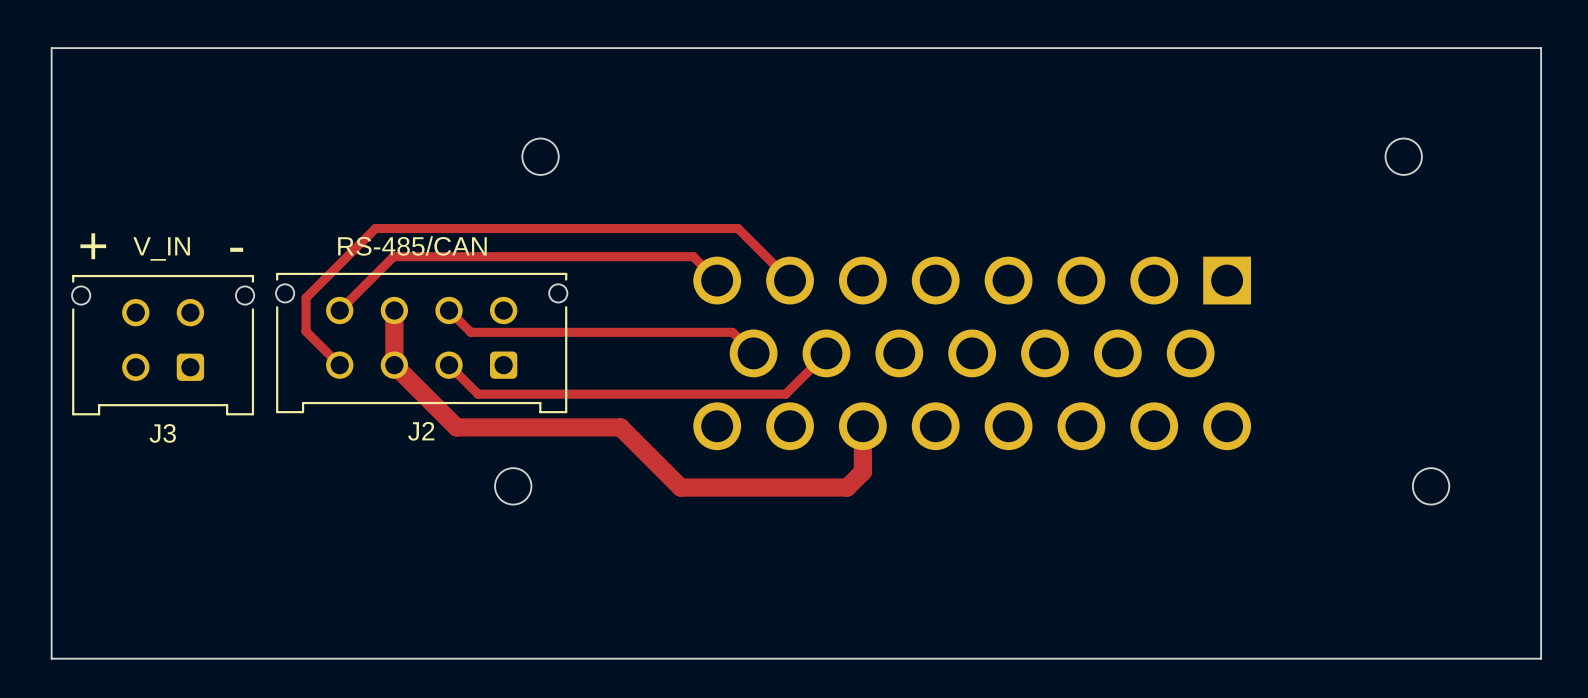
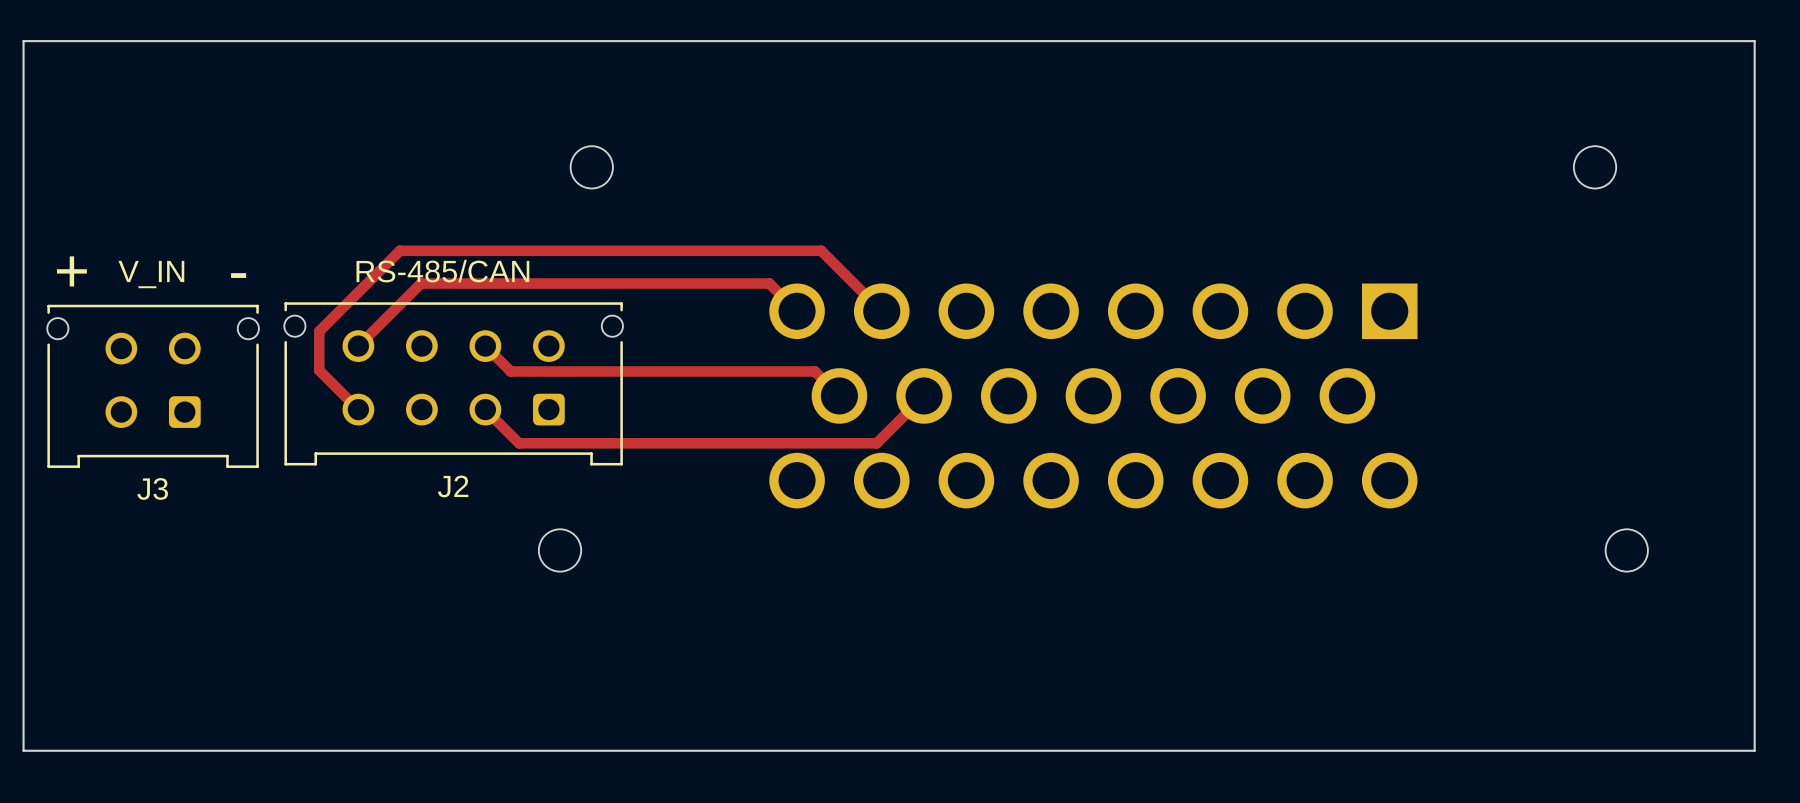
track: (394, 310) (394, 365) (456, 427) (620, 427) (680, 487) (847, 487) (862, 471) (862, 426) -> none

